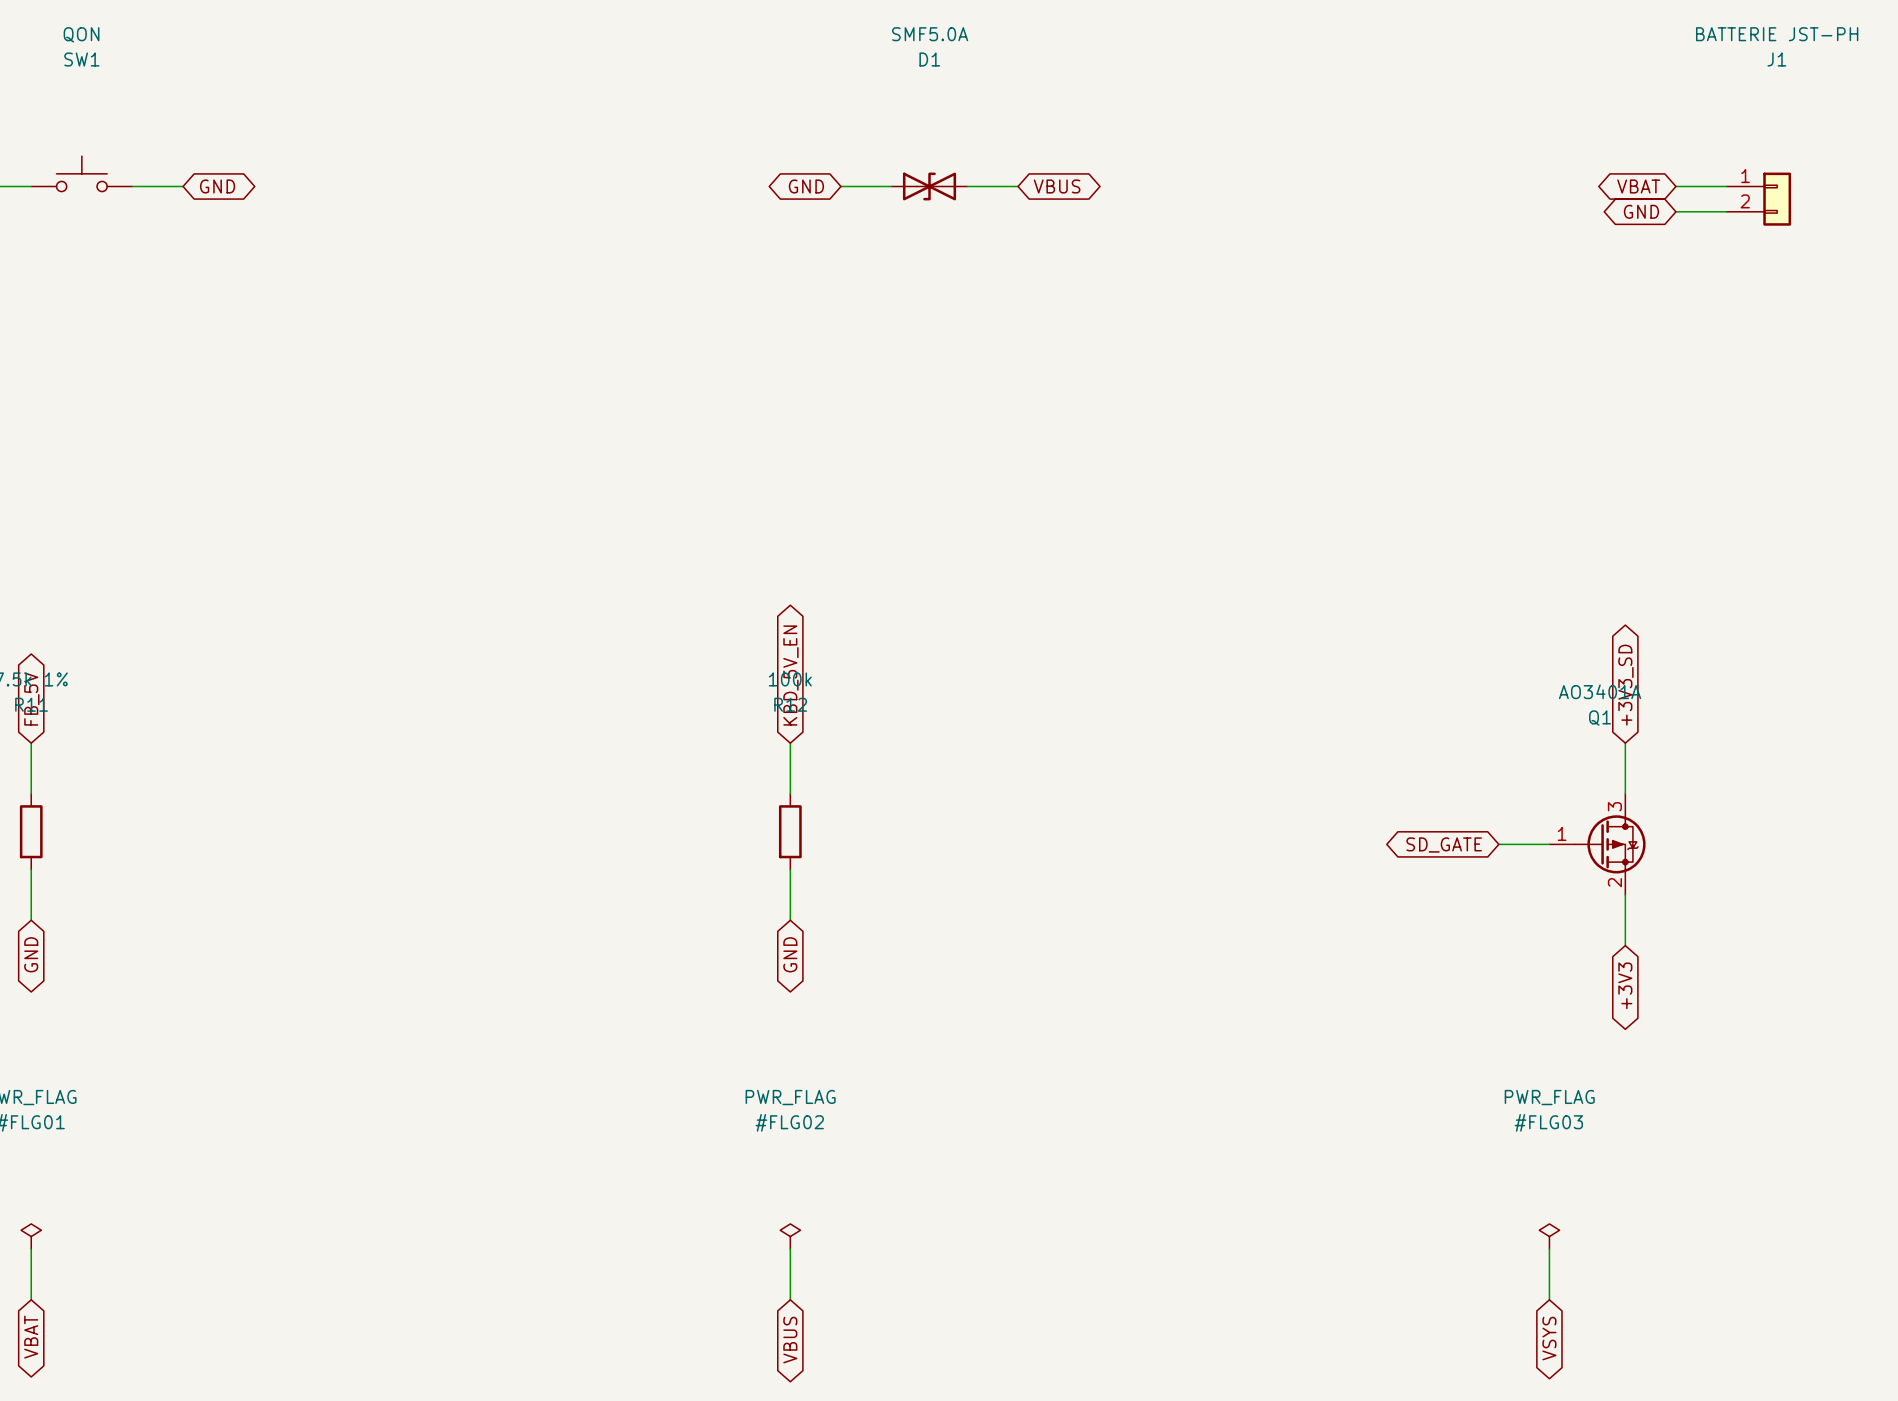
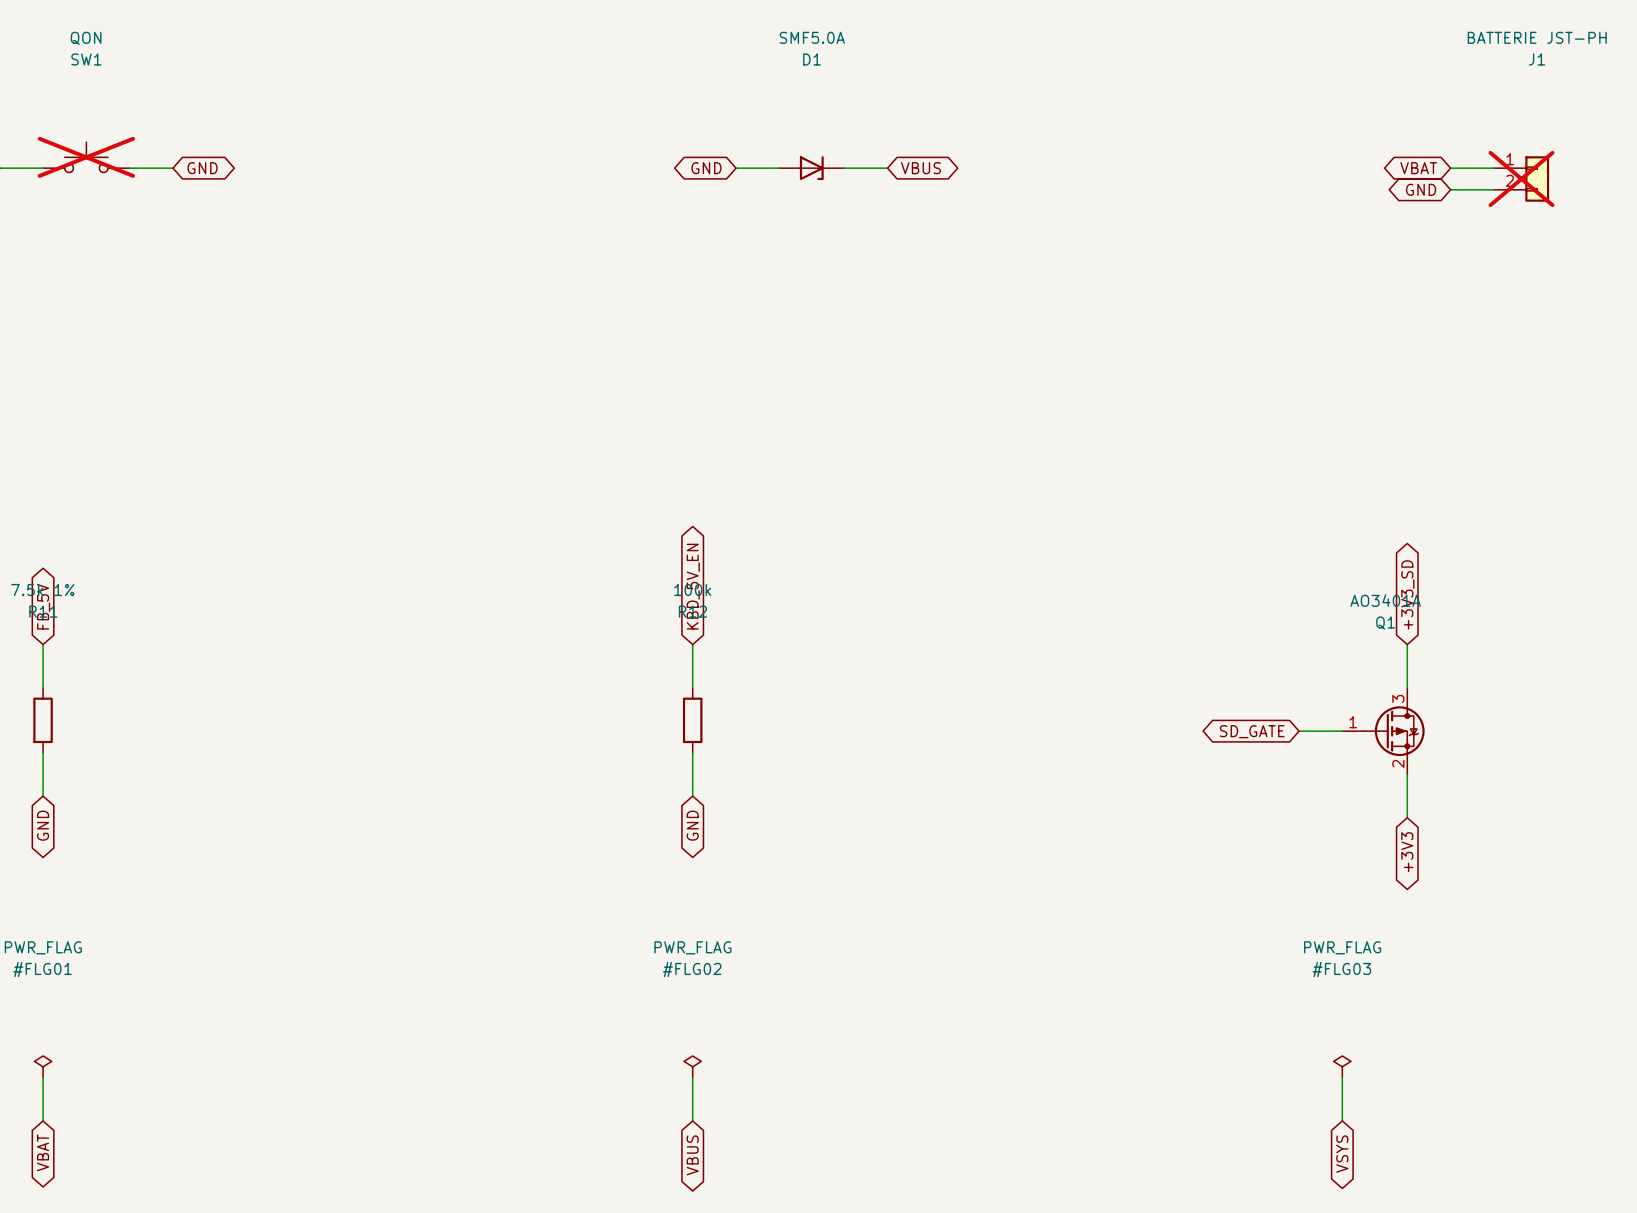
D1 symbol: [891, 172, 968, 201] -> [779, 156, 845, 181]
SW1 do-not-place cross: none -> (86, 157)
J1 do-not-place cross: none -> (1521, 178)

